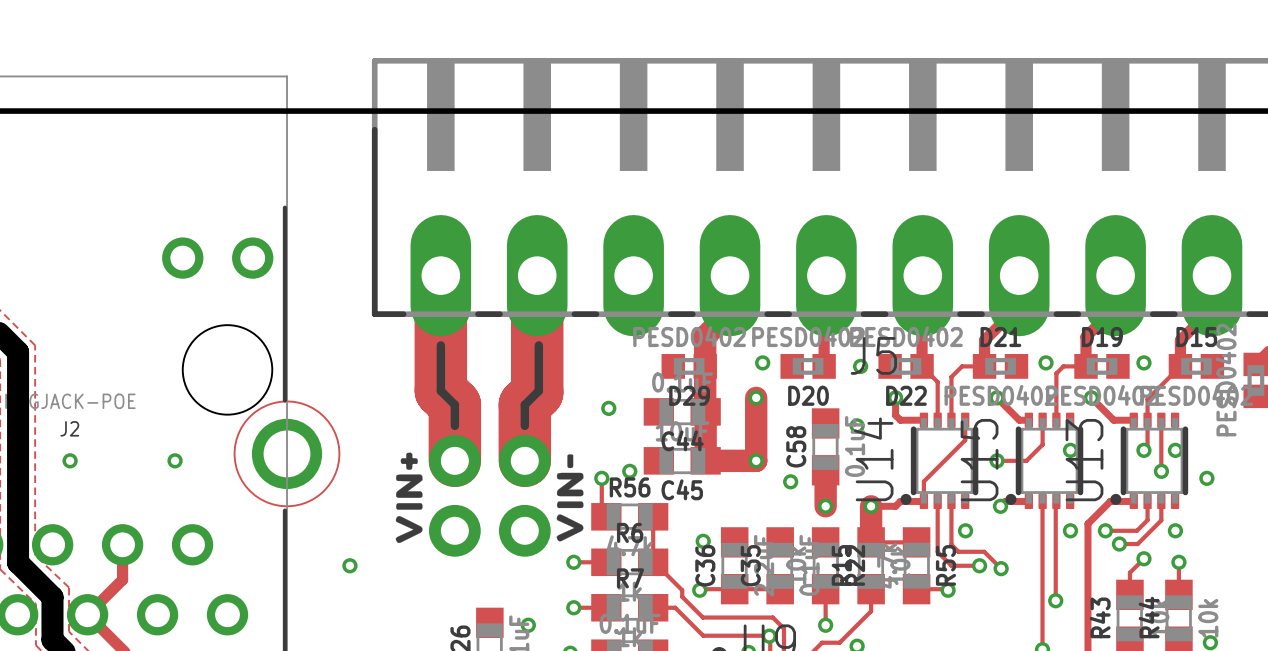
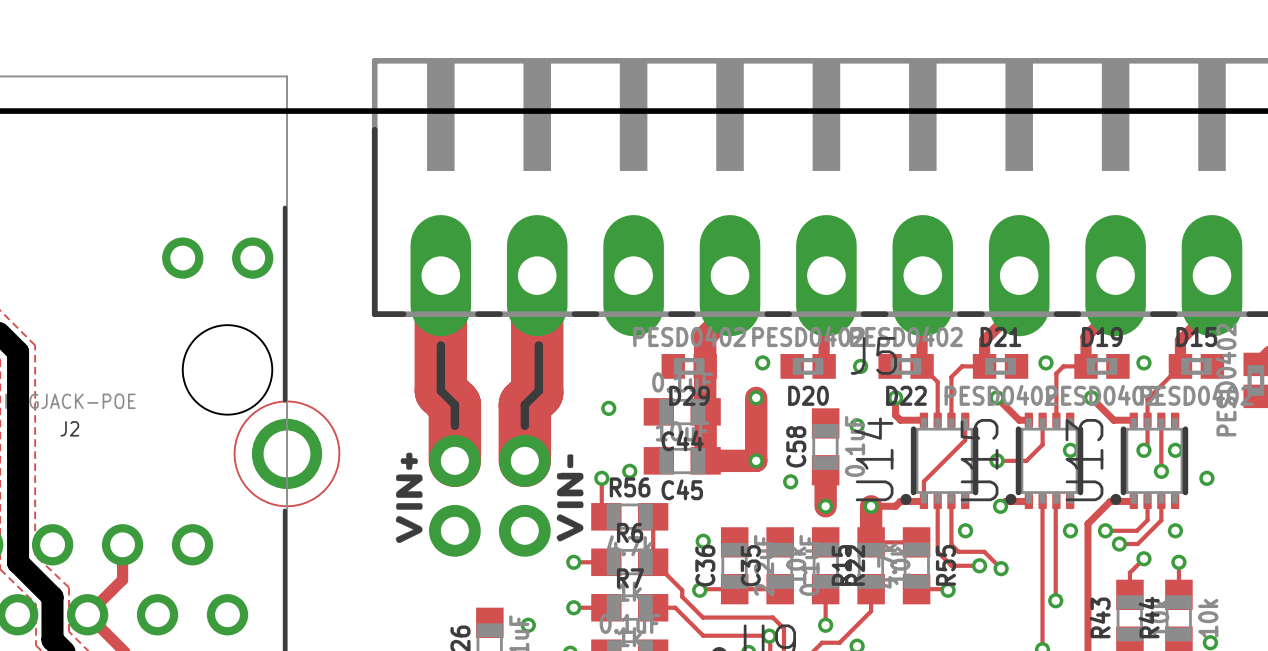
via: (70, 460) -> none
via: (175, 460) -> none
via: (349, 565) -> none

